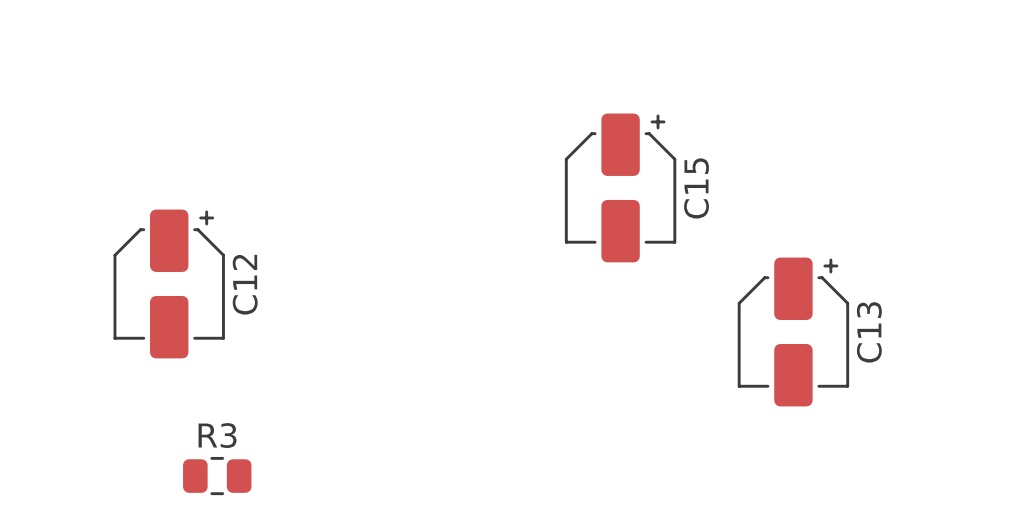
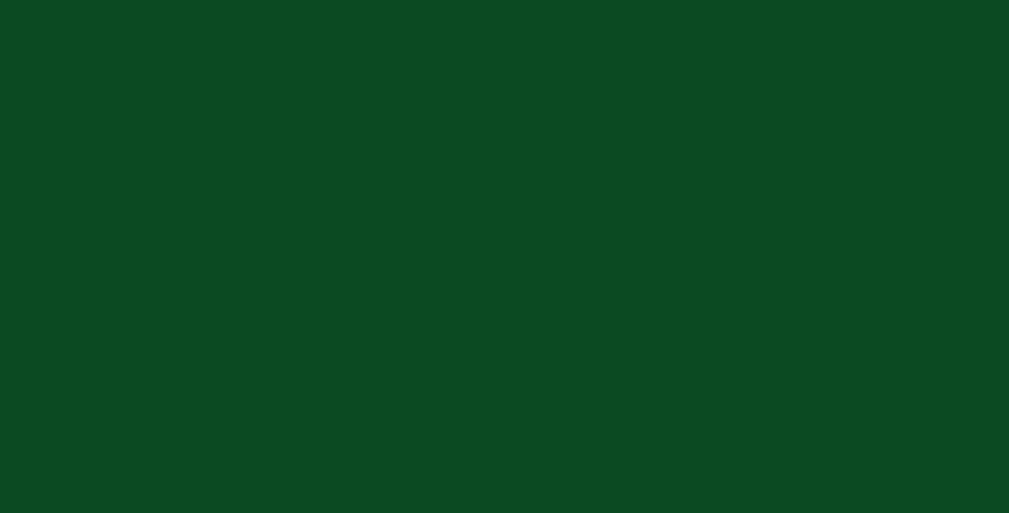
C15: (620, 187) -> none
C12: (169, 283) -> none
C13: (793, 332) -> none
R3: (217, 476) -> none

